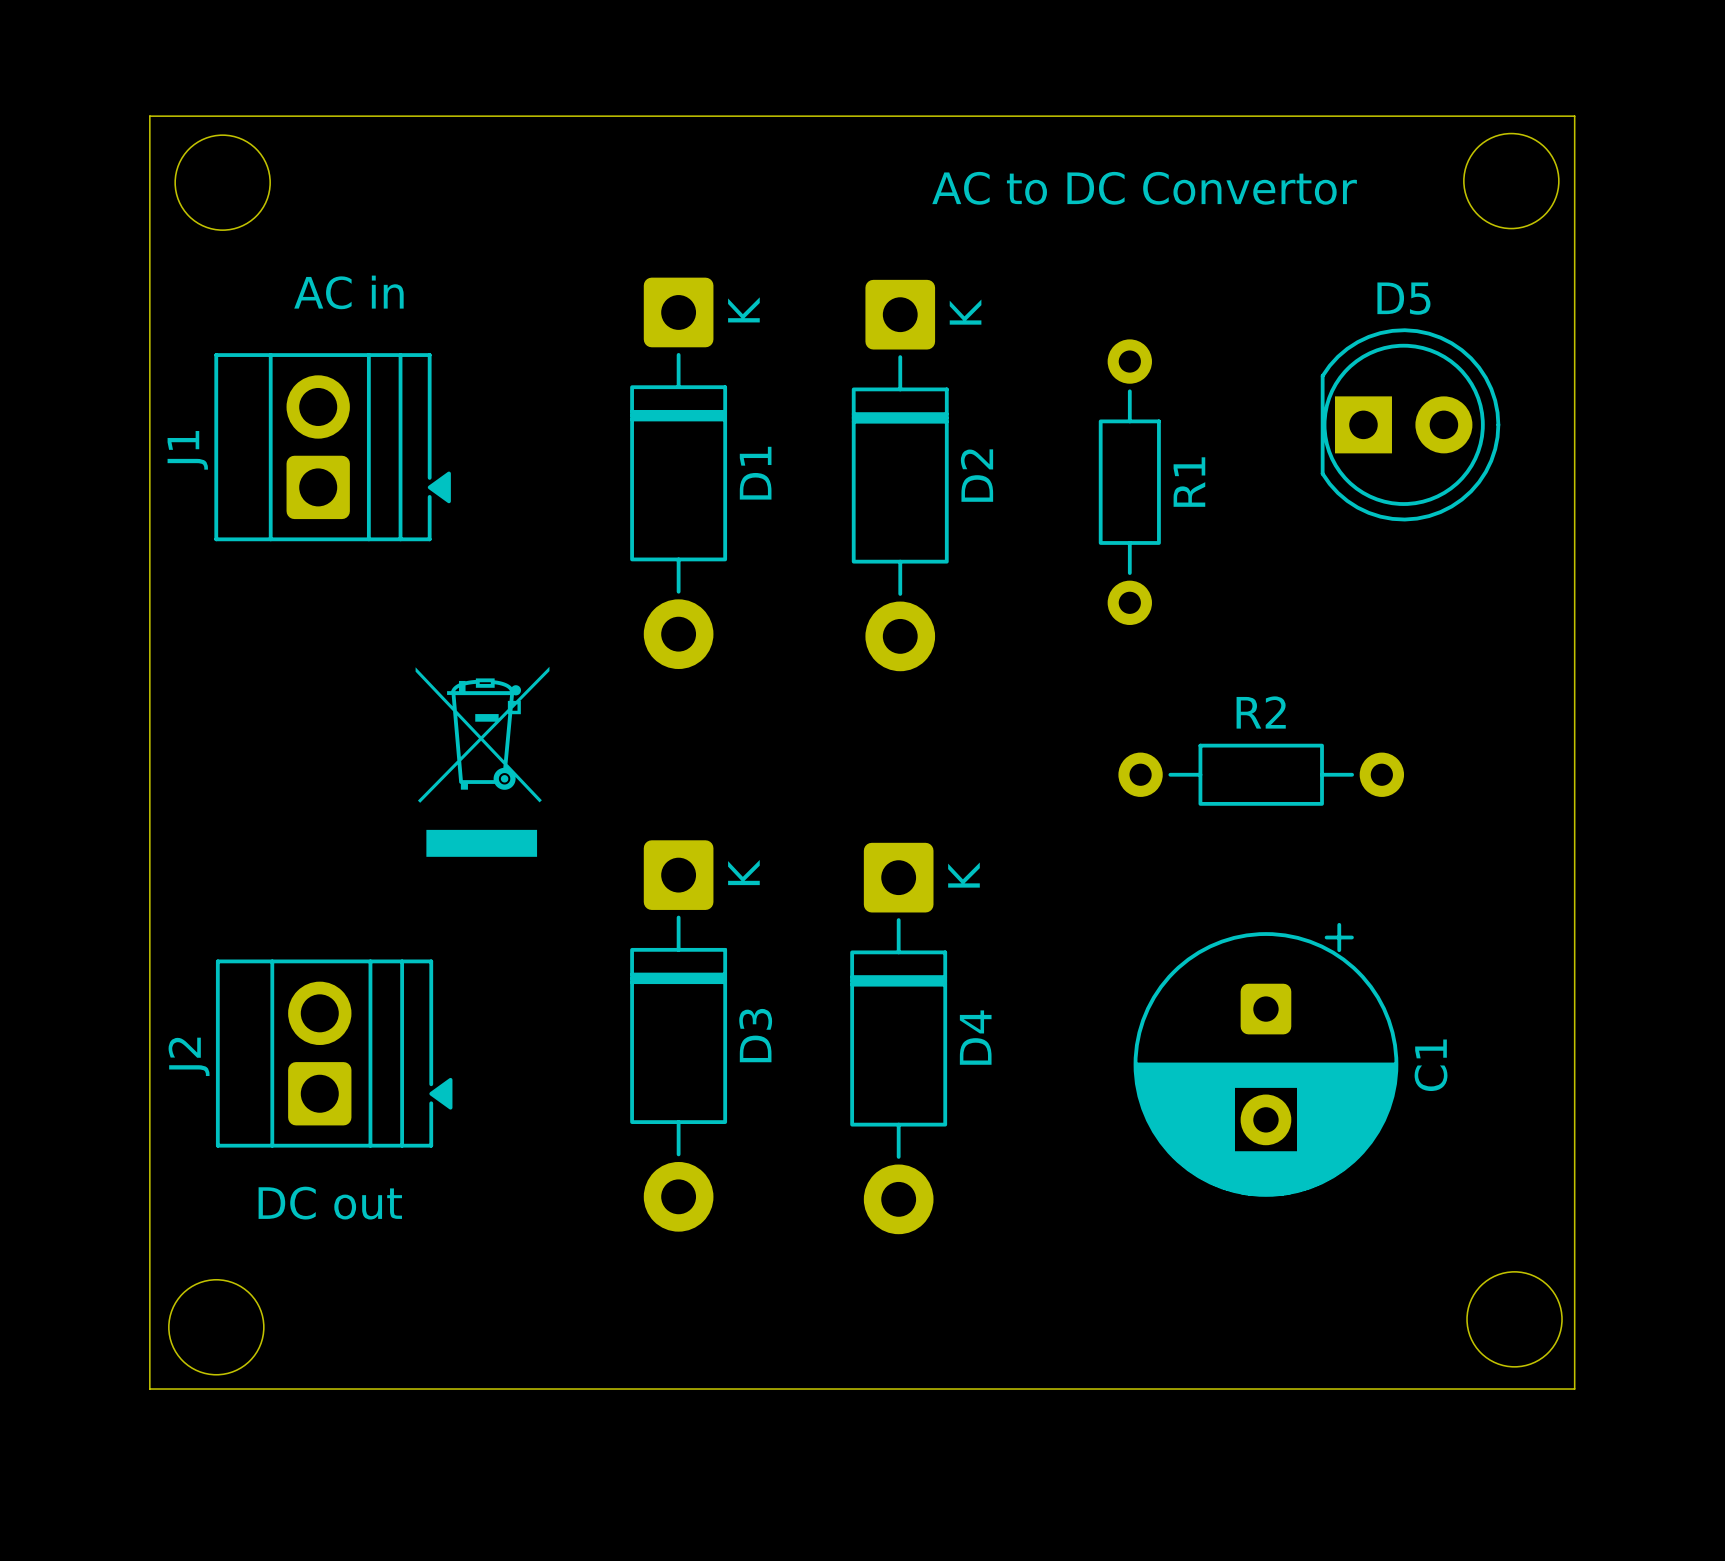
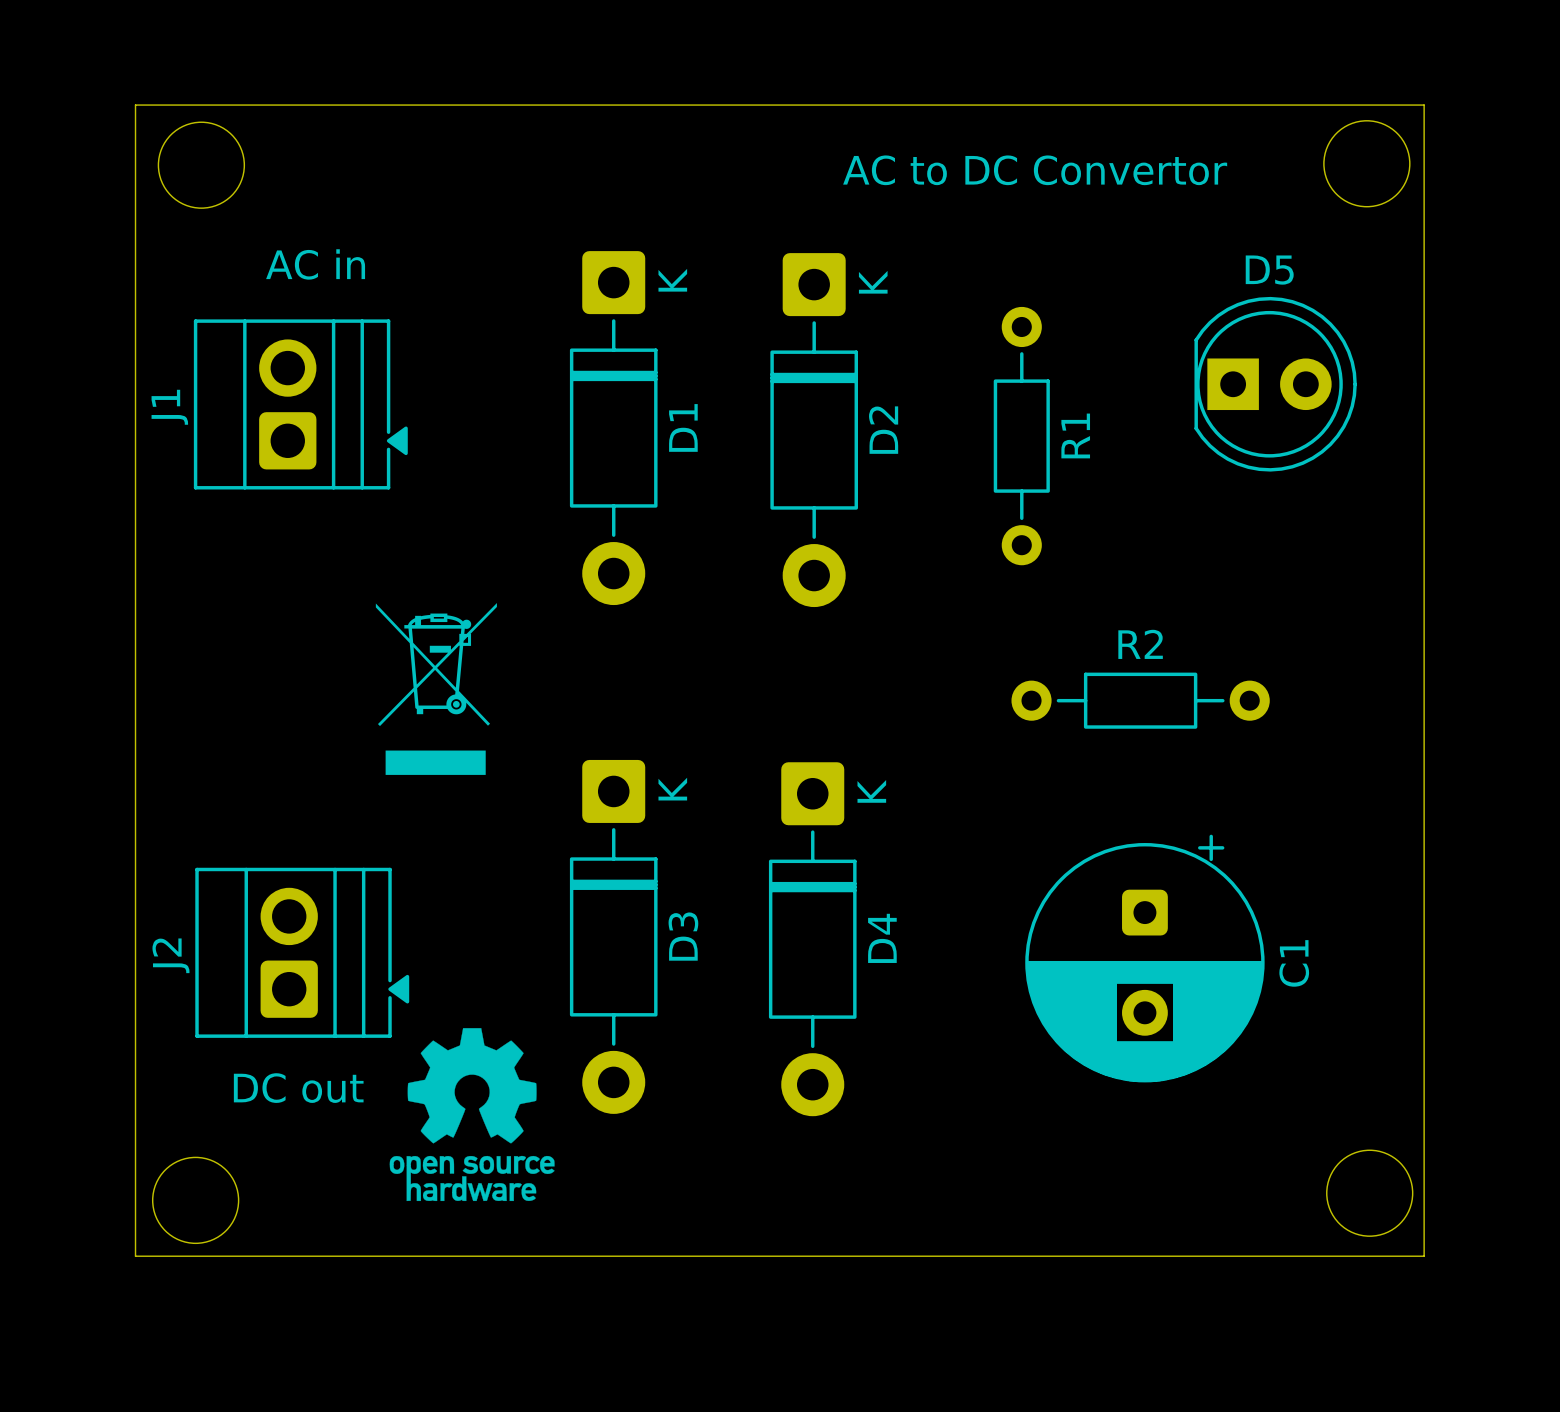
drawing: none -> [389, 1028, 555, 1202]

